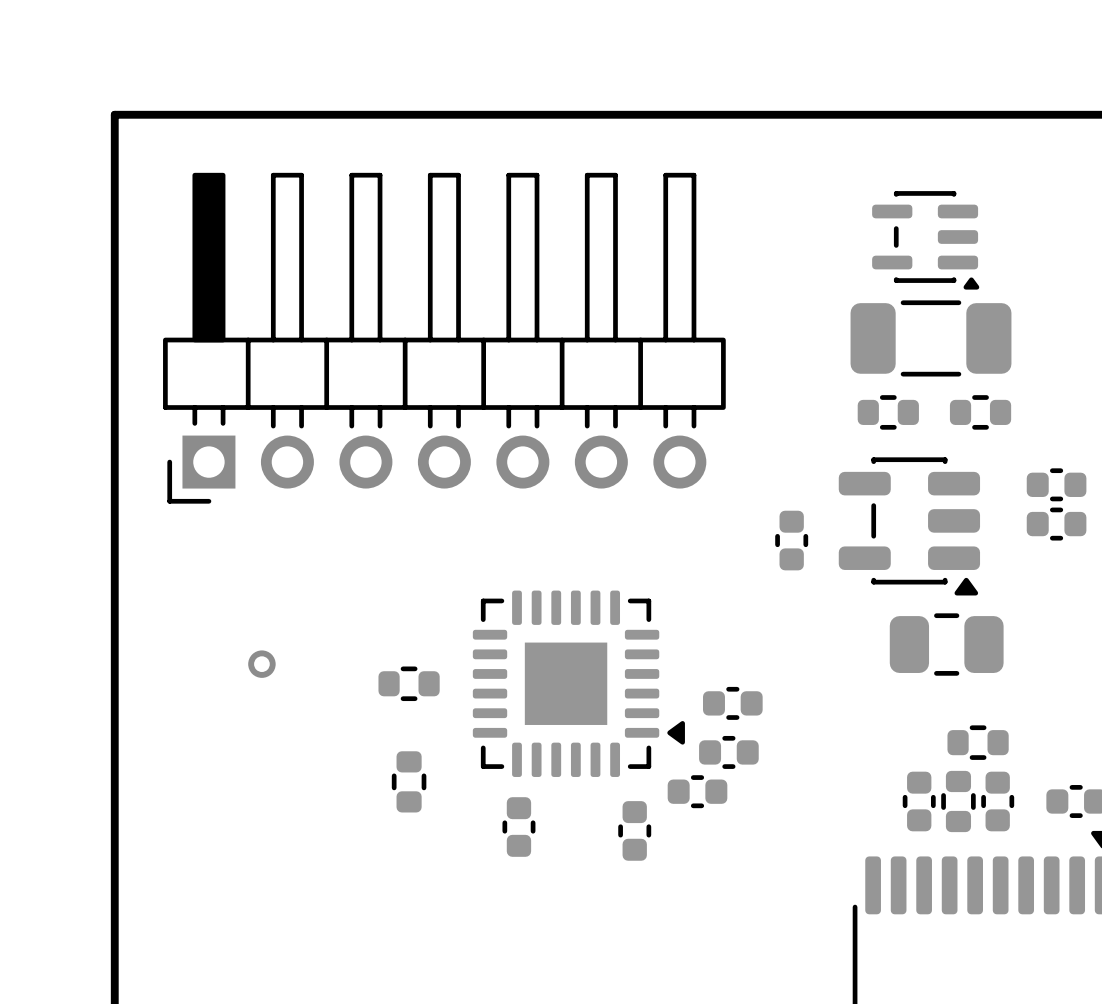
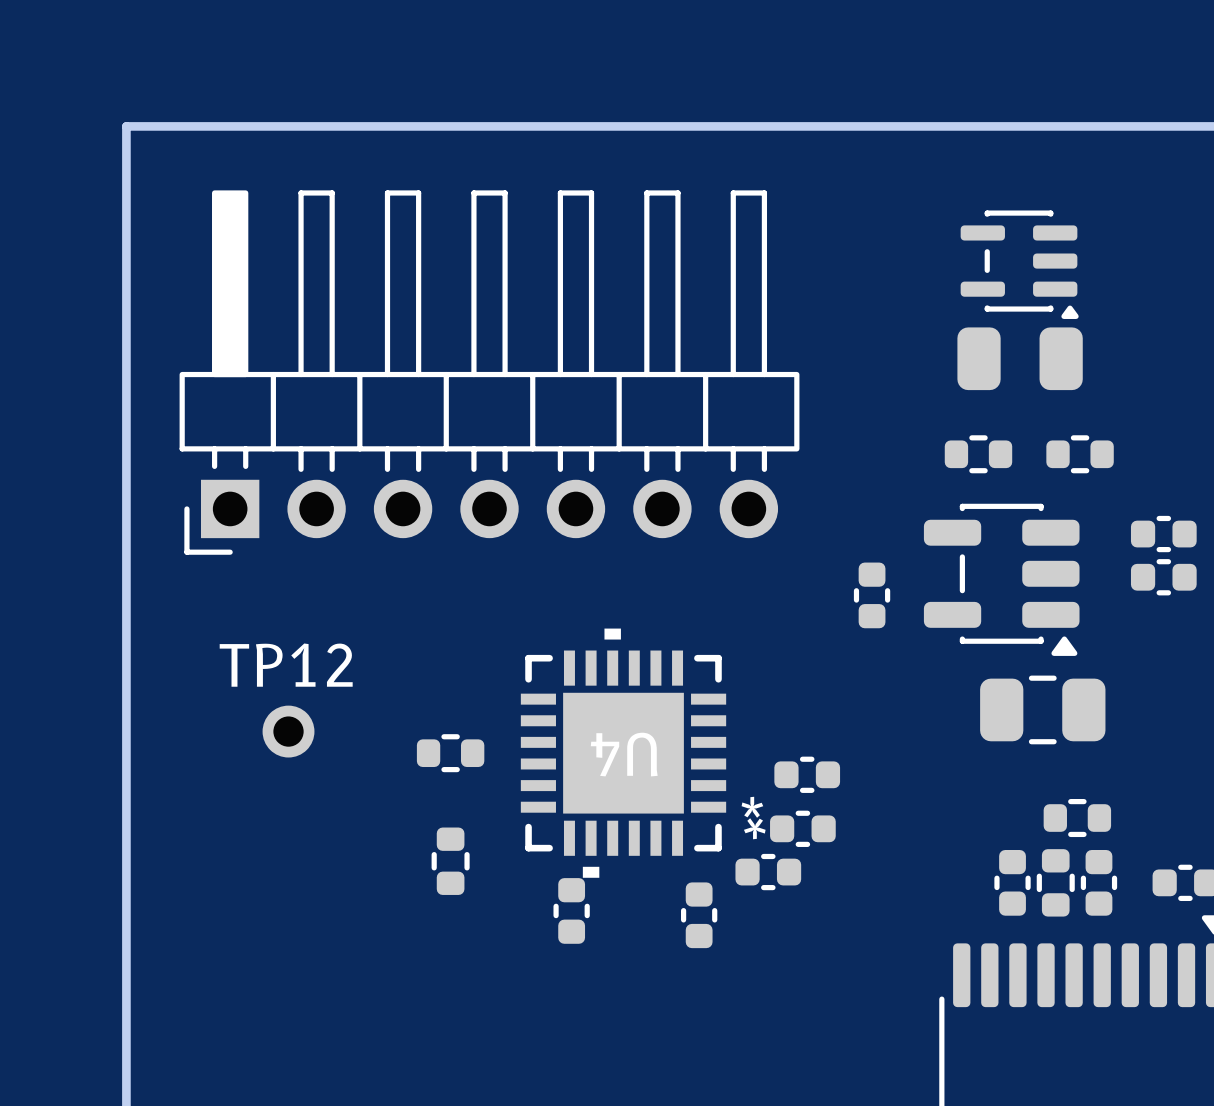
part footprint: [850, 300, 1012, 377] -> [957, 327, 1083, 391]
part: (261, 664) -> none
TP12: none -> (288, 731)
part: none -> (623, 753)
part: (578, 683) -> none

